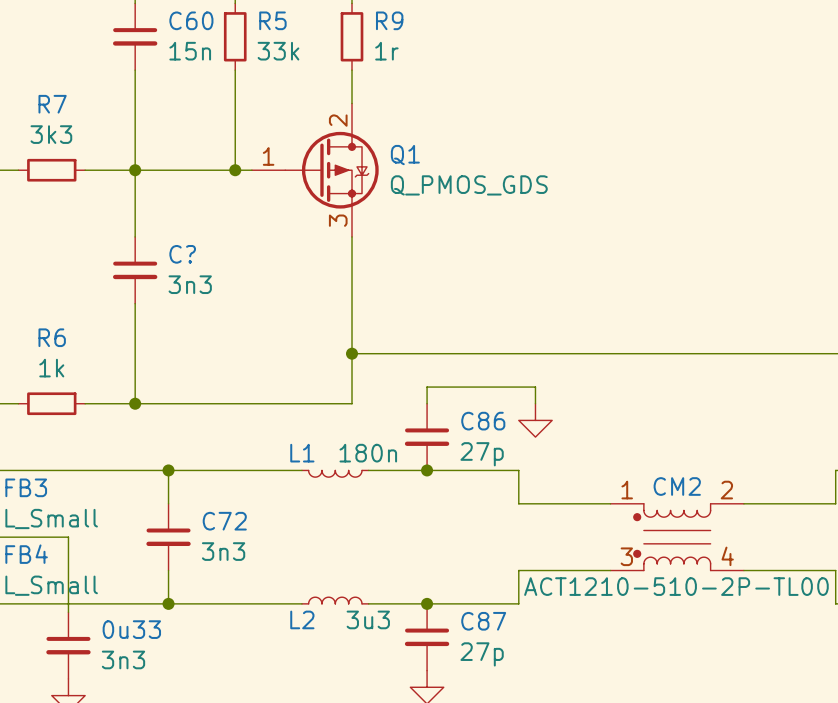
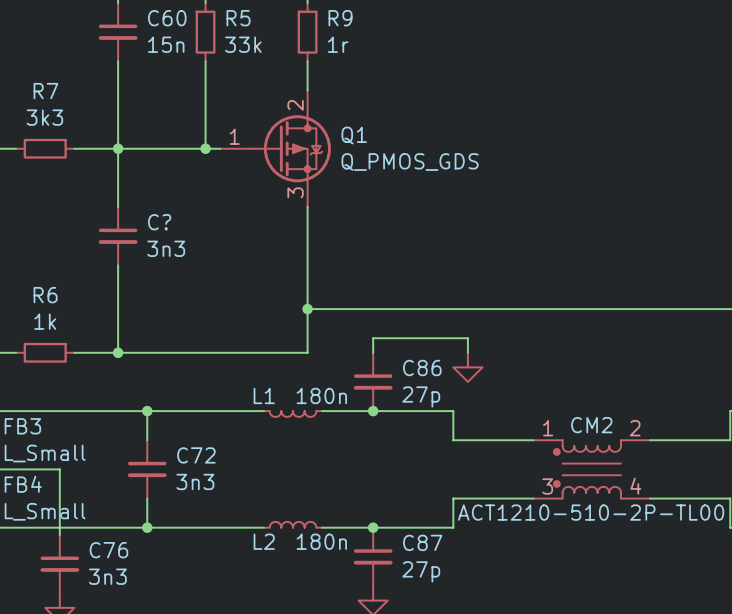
L2 value: 3u3 (368, 619) -> 180n (321, 541)
0u33 name: 0u33 (131, 629) -> C76 (108, 550)

